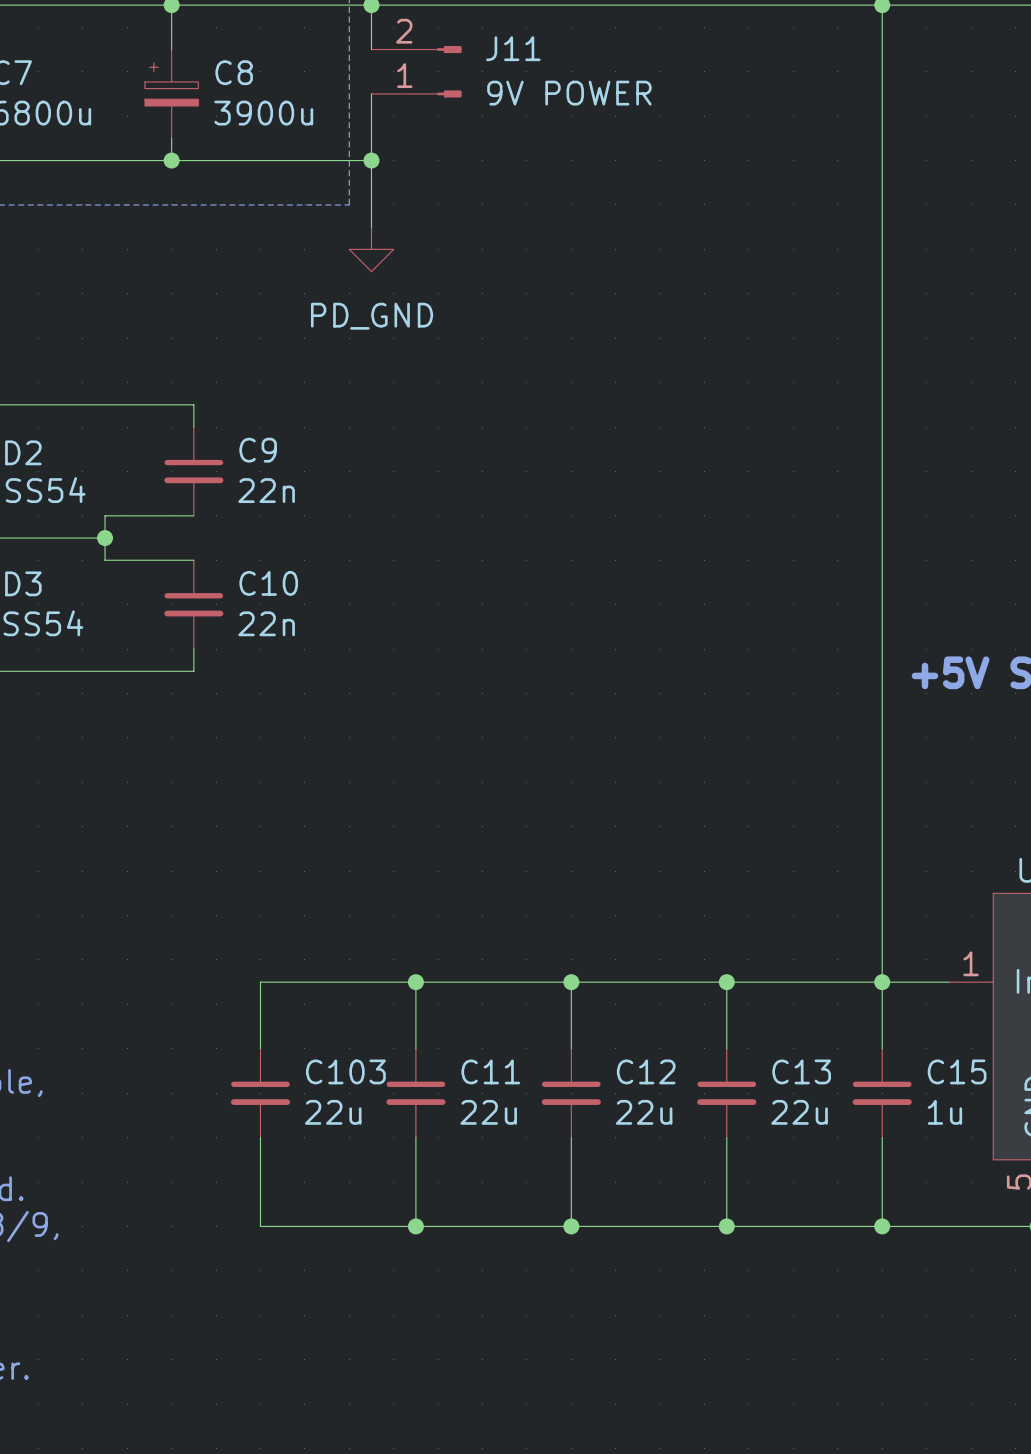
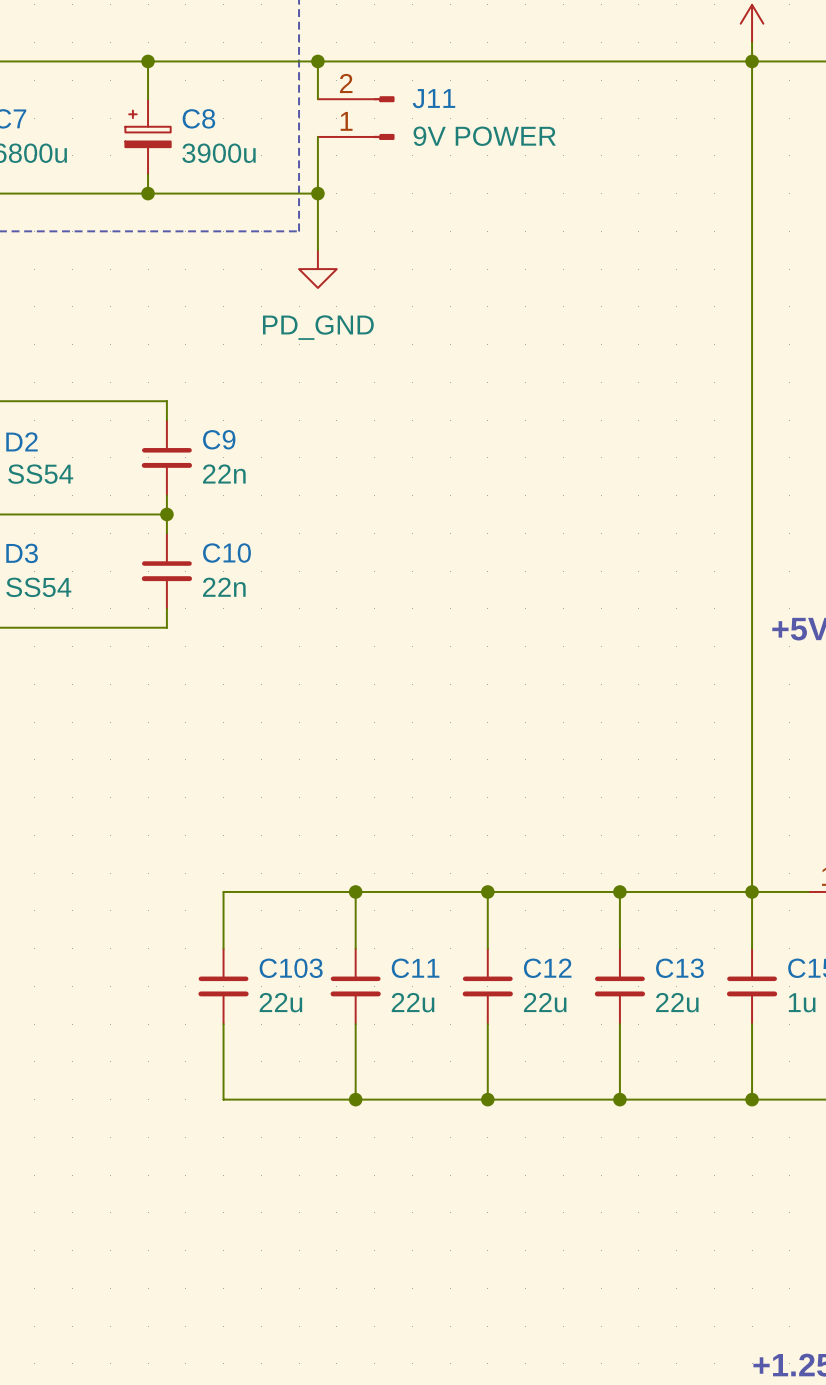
wire: (193, 515) (105, 515) (105, 560) (193, 560) -> (166, 495) (166, 533)
wire: none -> (91, 514) (166, 514)
junction position: (105, 538) -> (166, 514)

